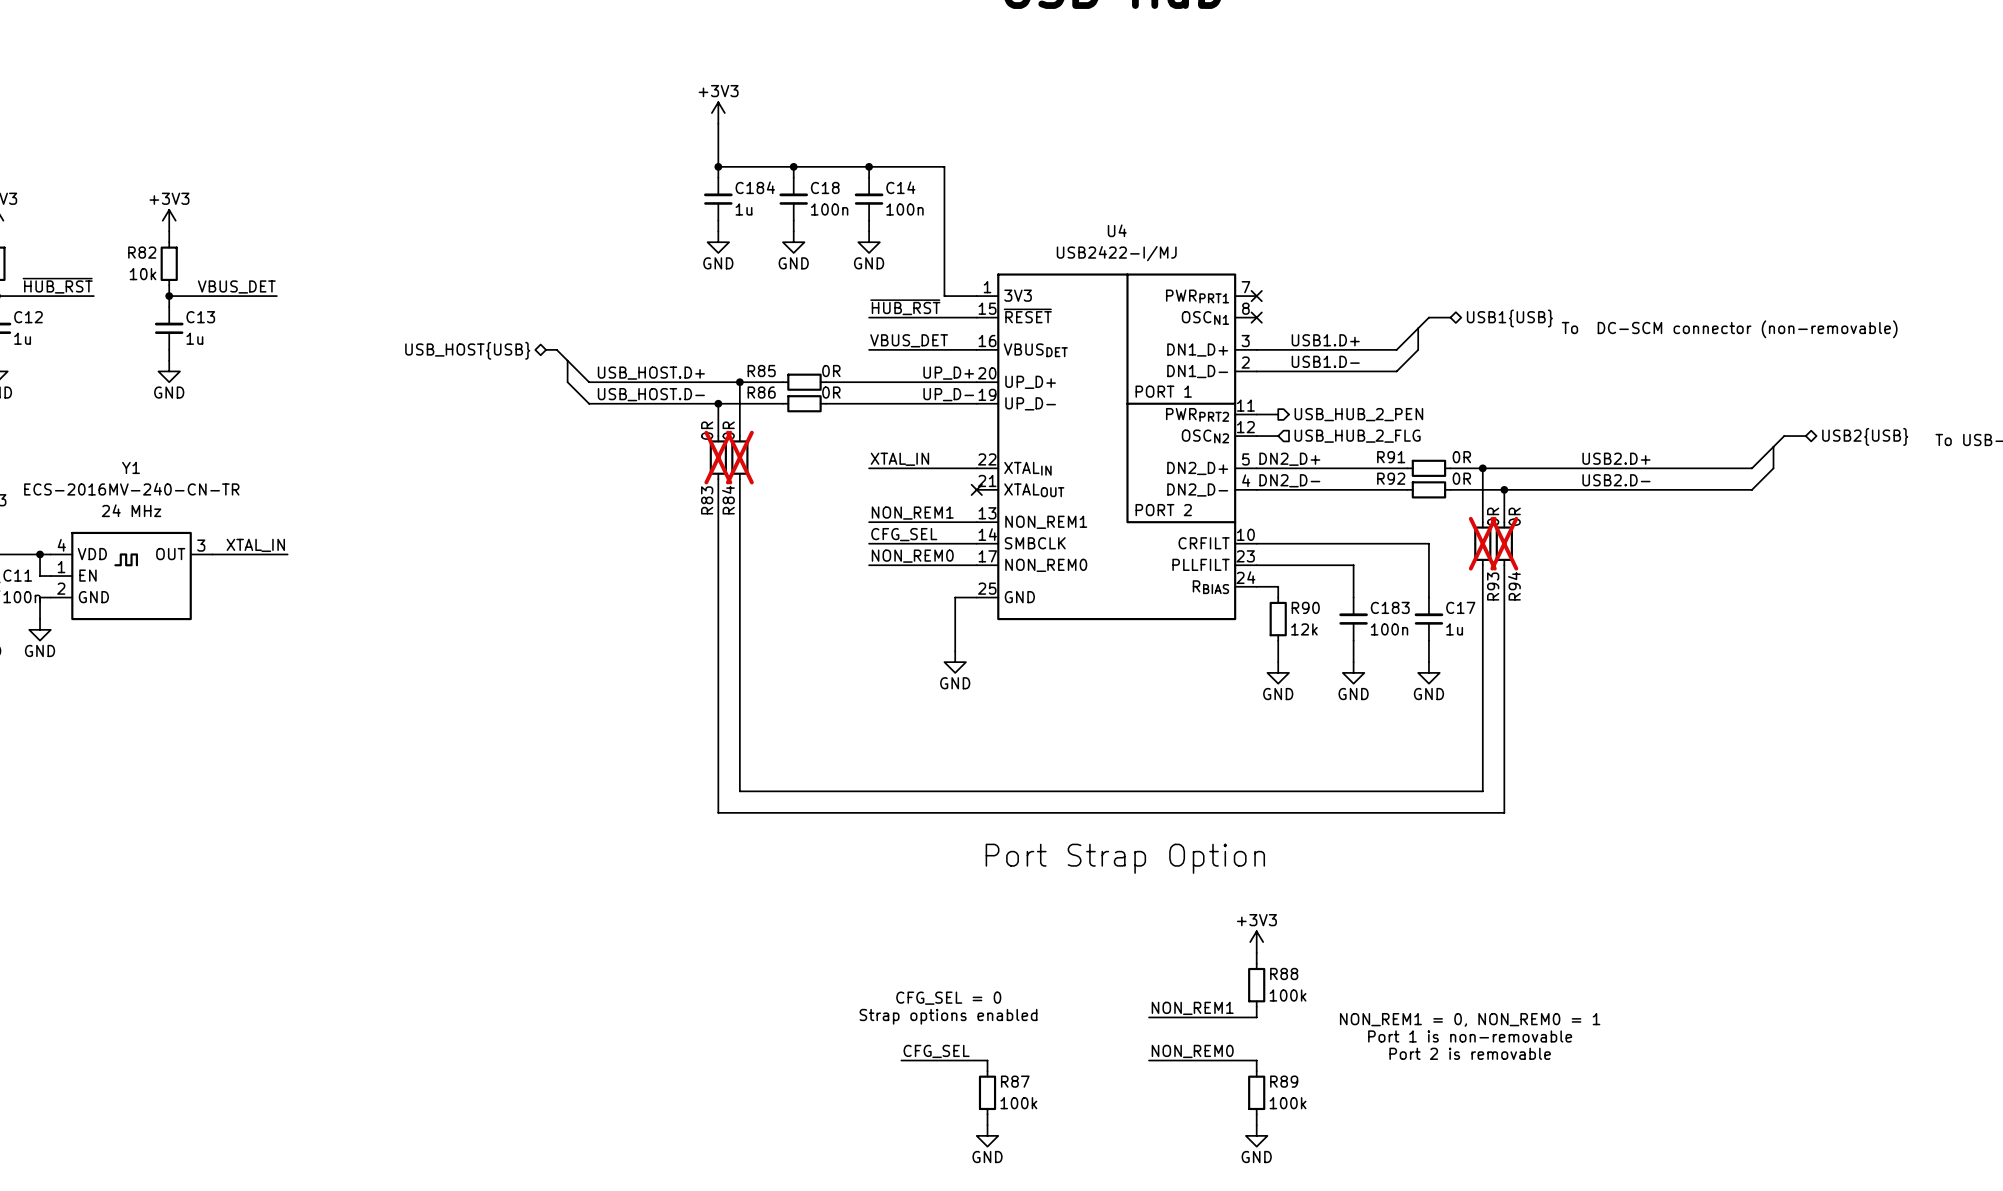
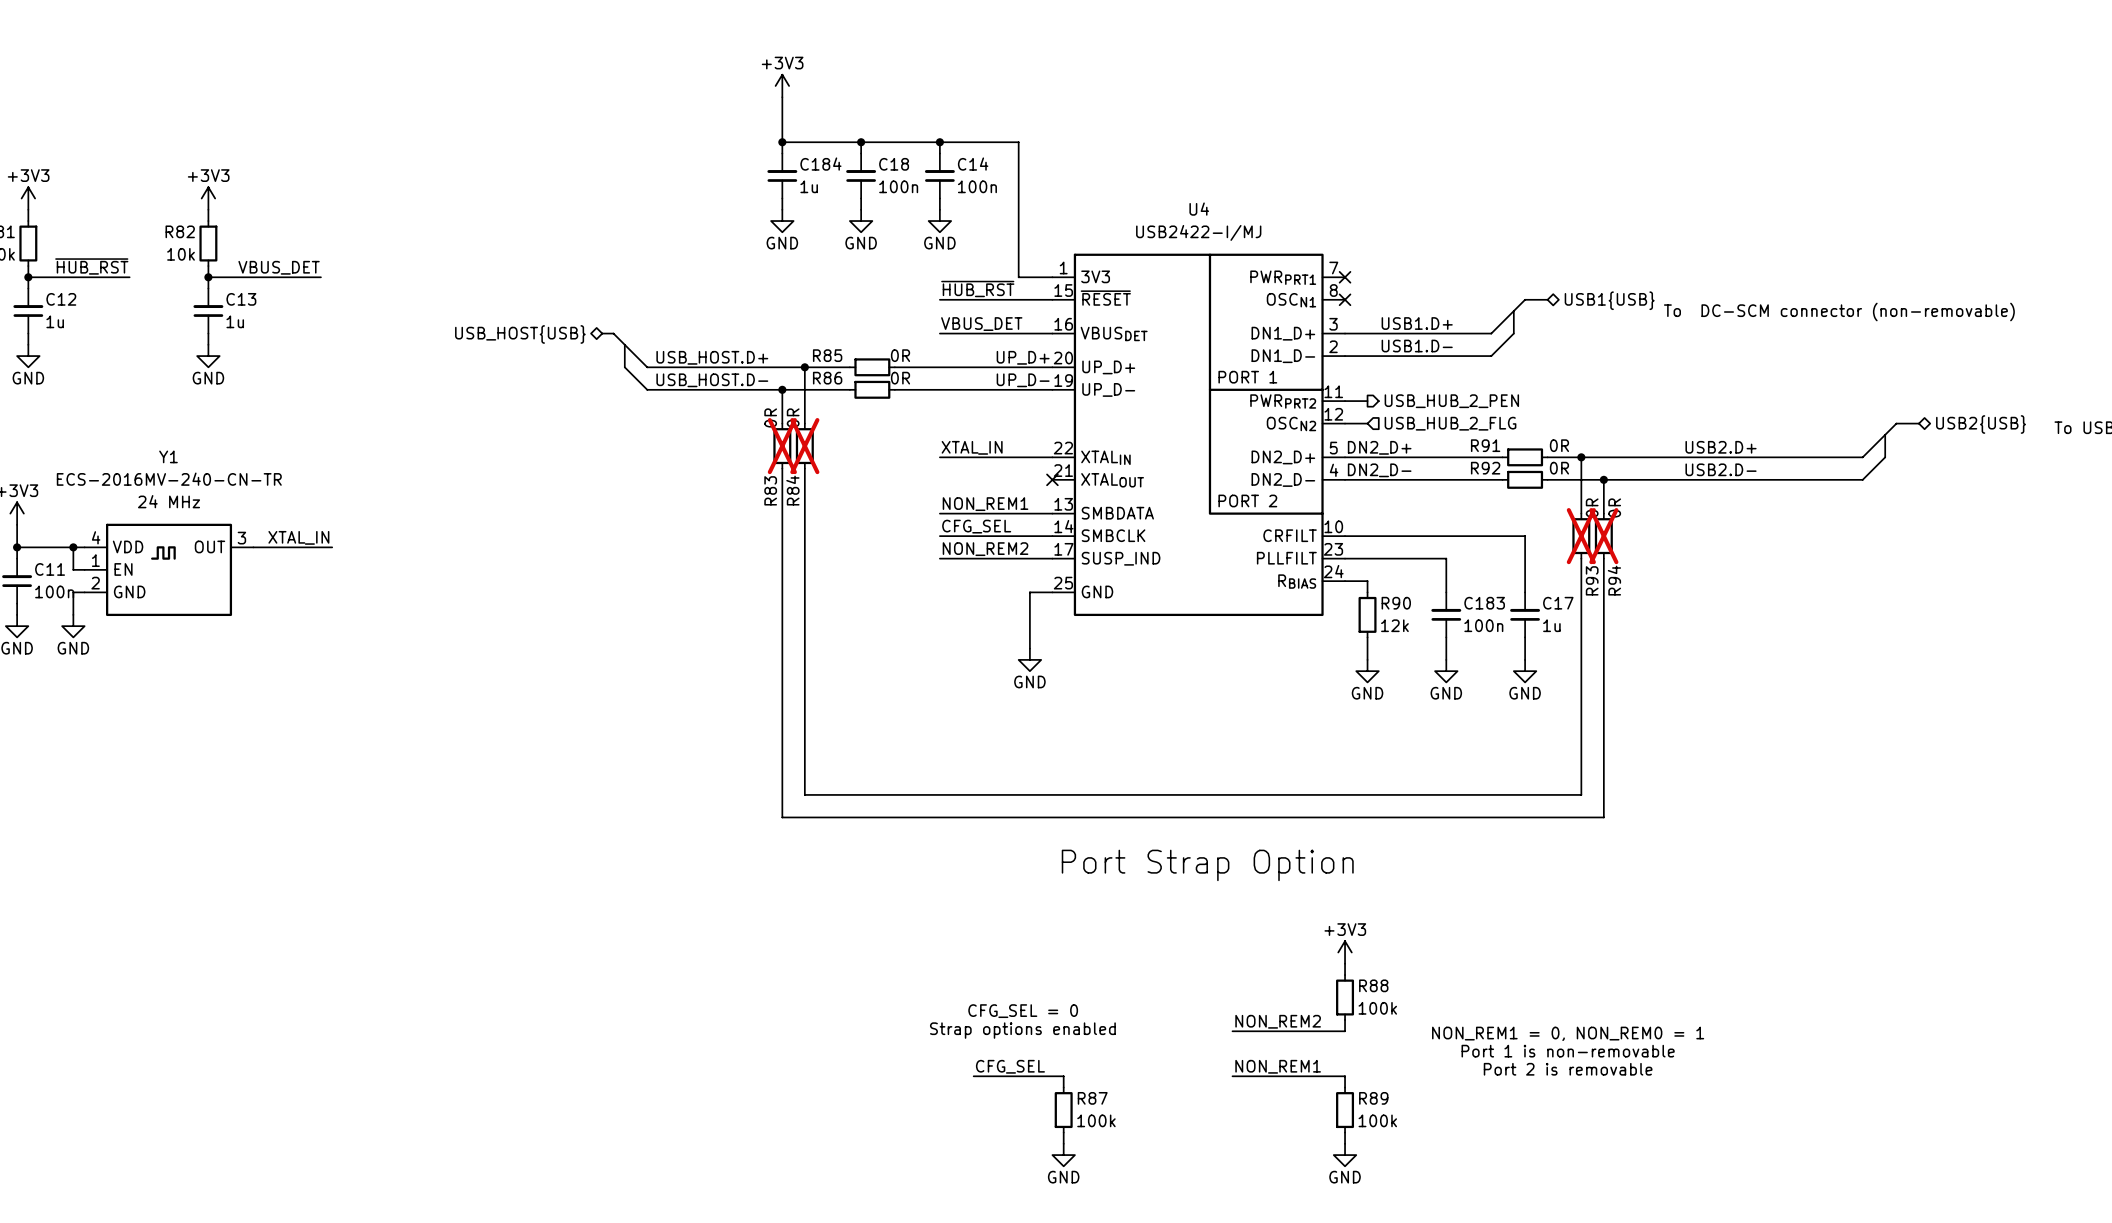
U4 pin name: NON_REM1 (1046, 522) -> SMBDATA (1117, 513)
label: NON_REM0 (912, 556) -> NON_REM2 (985, 549)
U4 pin name: NON_REM0 (1046, 565) -> SUSP_IND (1121, 558)
label: NON_REM1 (1192, 1008) -> NON_REM2 (1278, 1021)
label: NON_REM0 (1192, 1051) -> NON_REM1 (1278, 1066)

